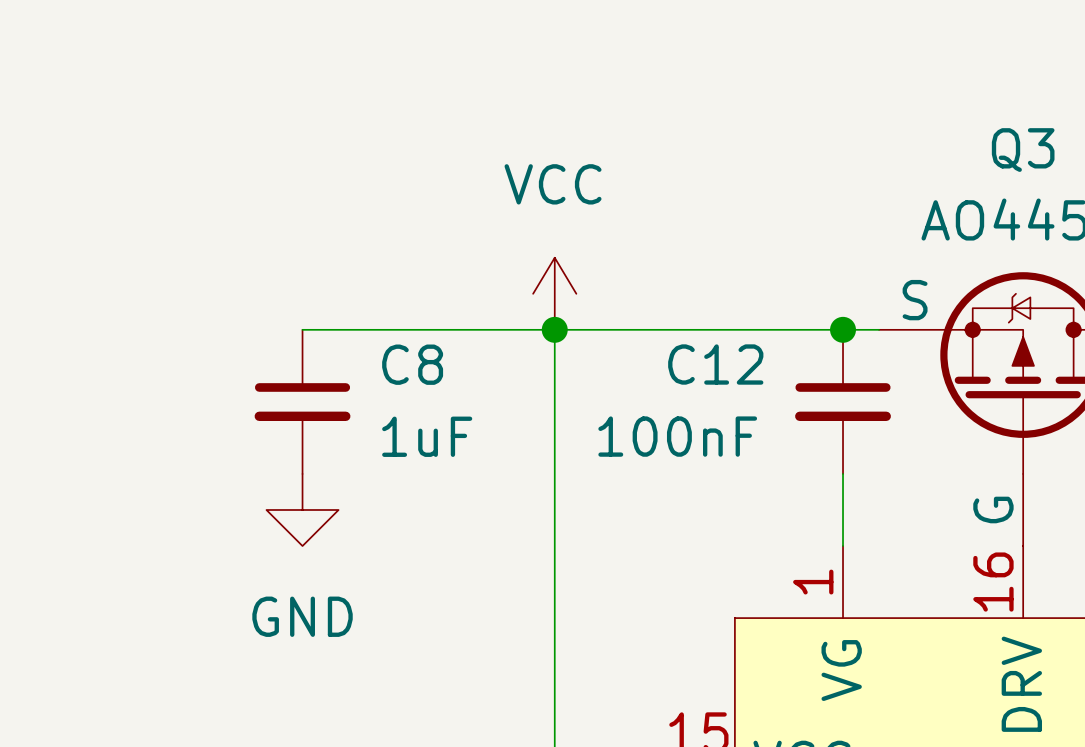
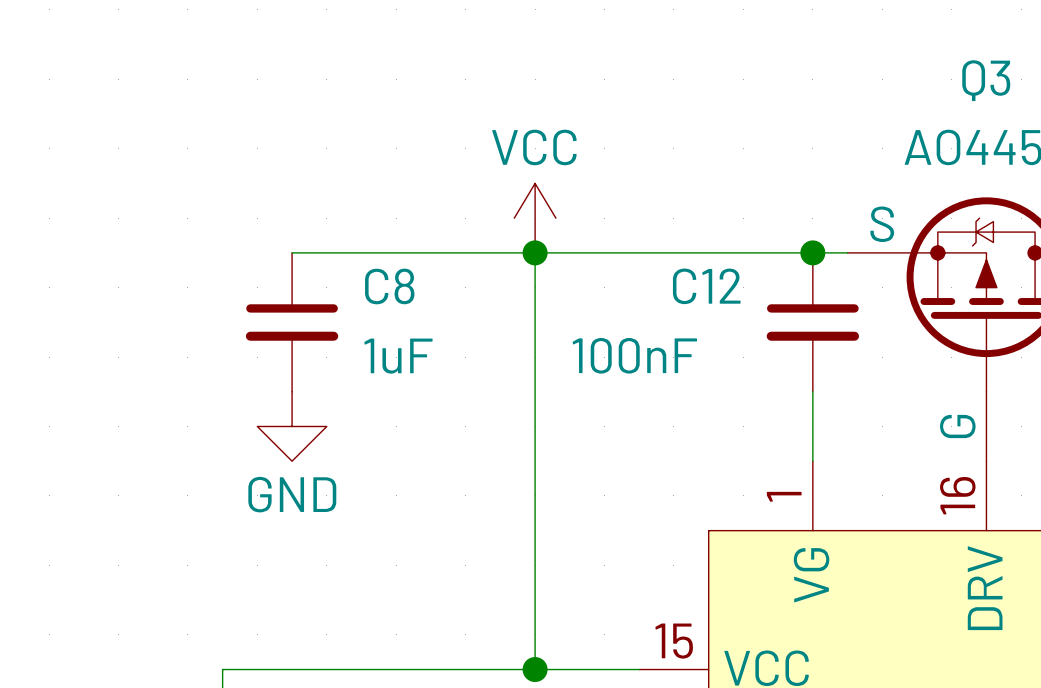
power symbol text position: VCC (553, 184) -> VCC (534, 147)
power symbol text position: GND (302, 616) -> GND (292, 494)

